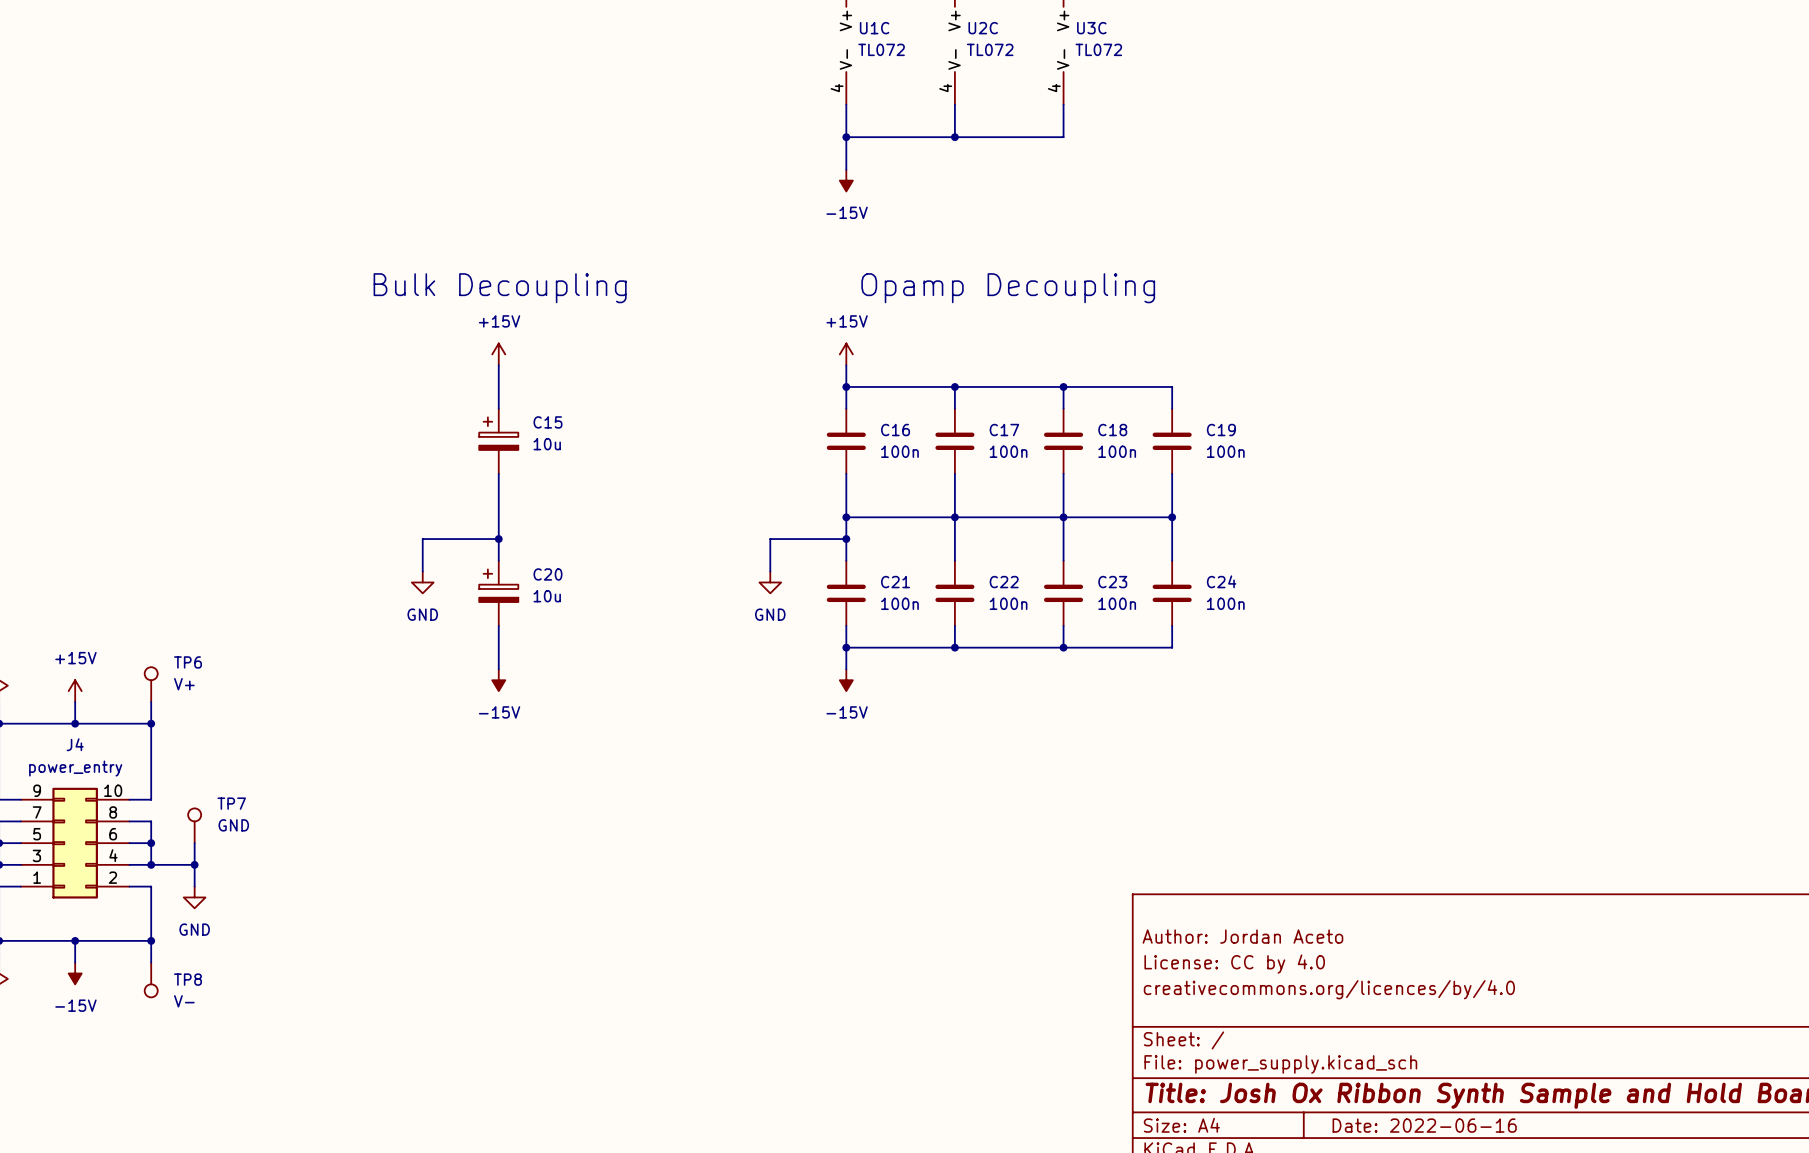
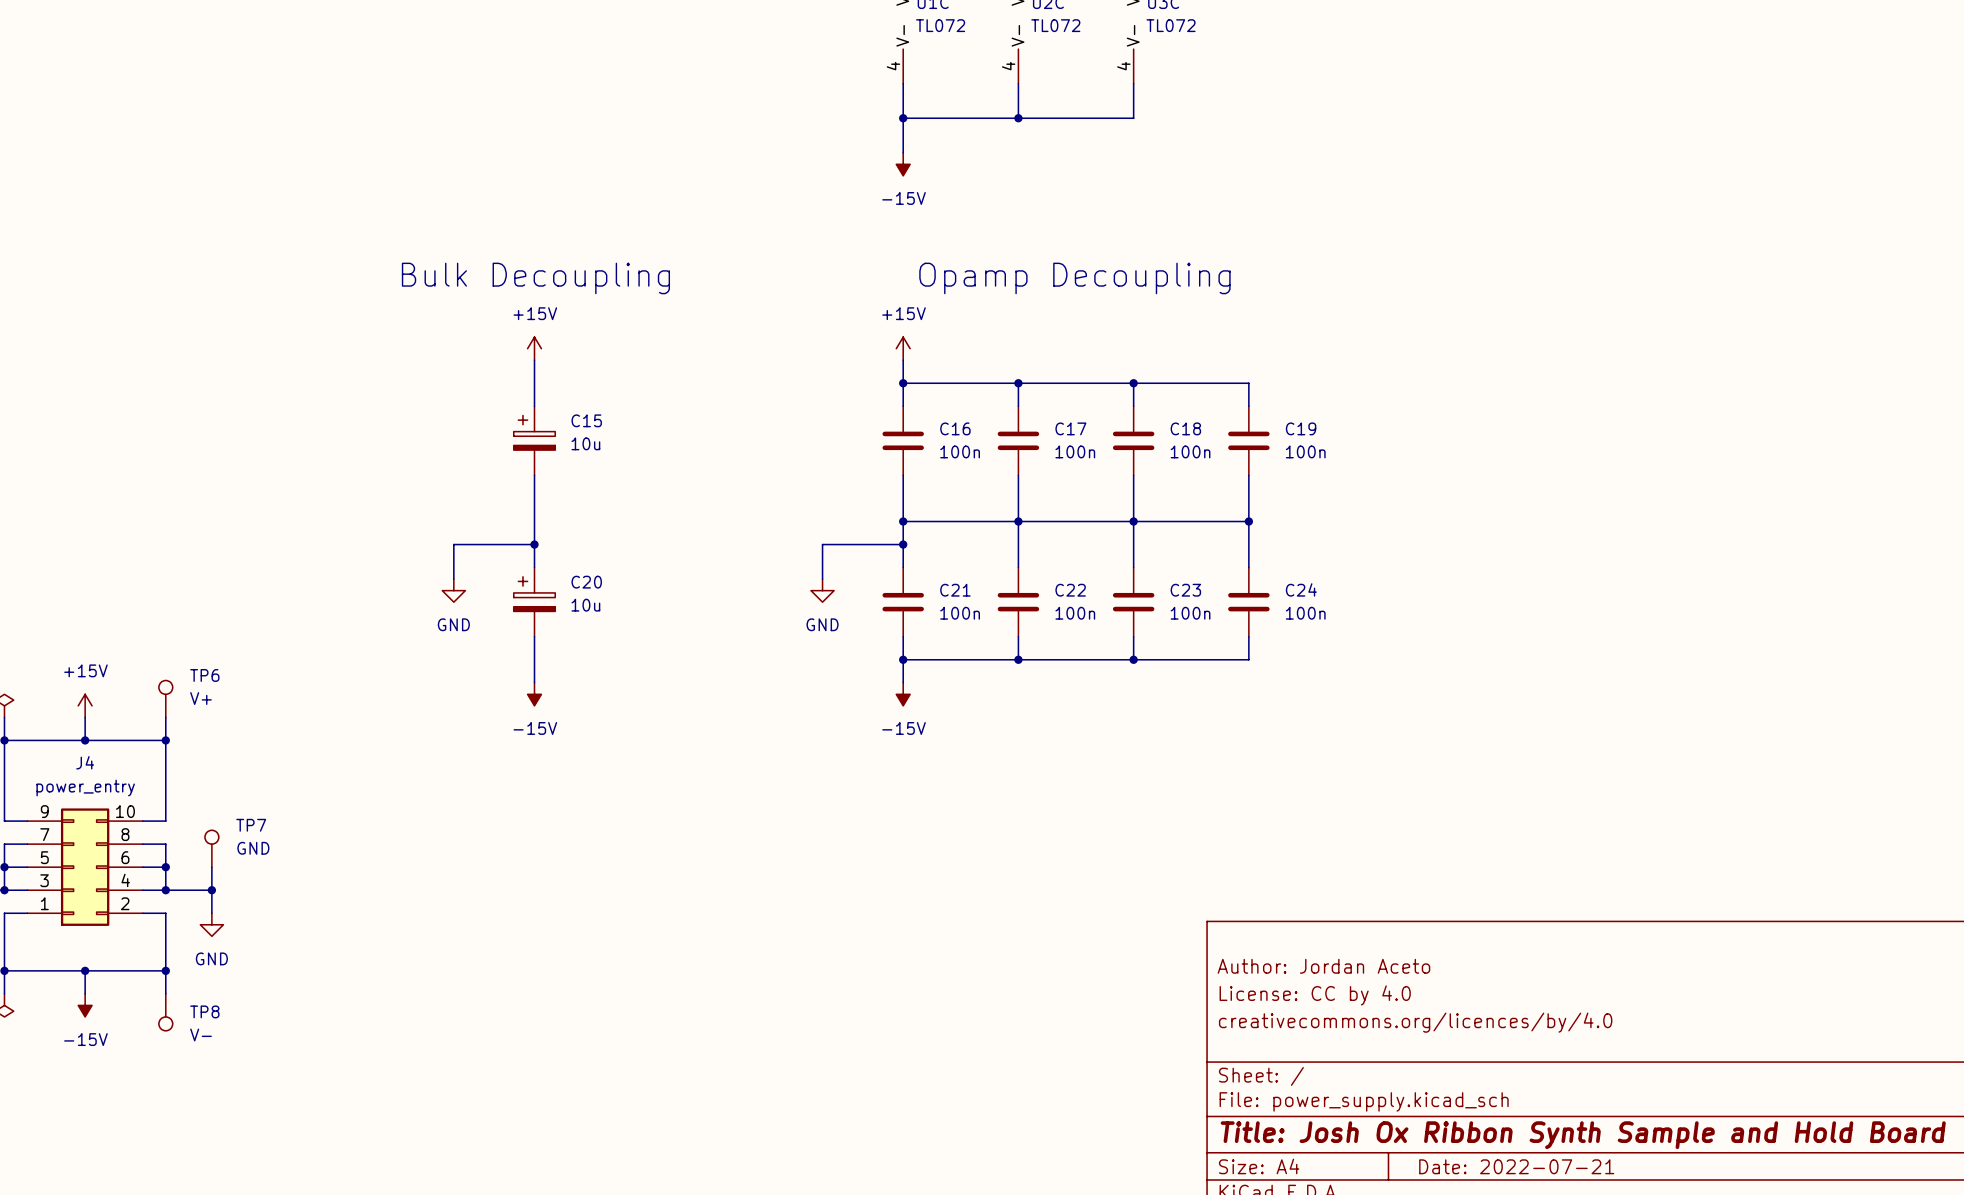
title block: Date: 2022-06-16 (1424, 1125) -> Date: 2022-07-21 (1516, 1166)

